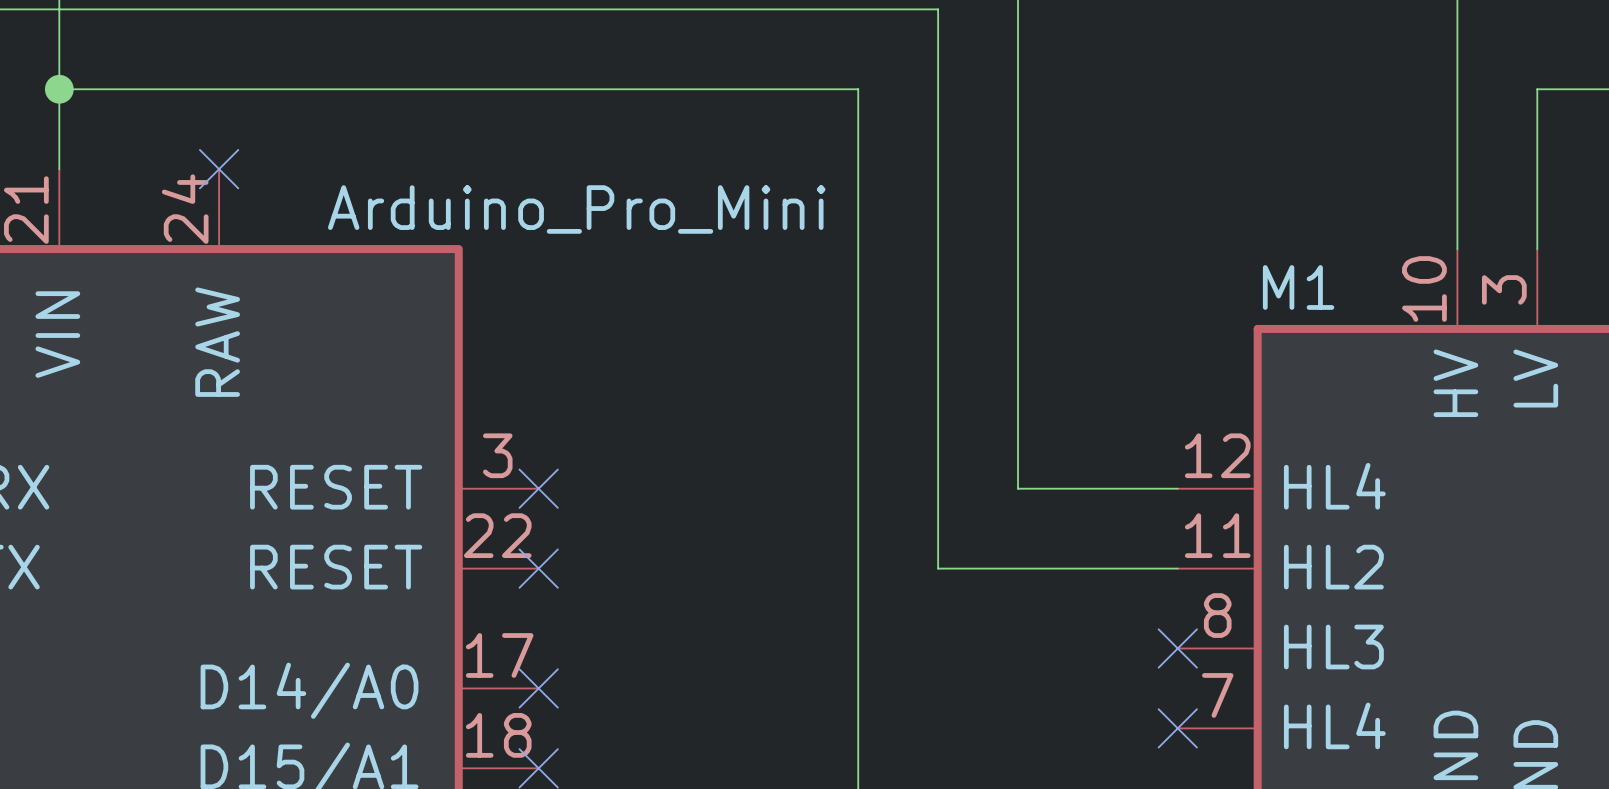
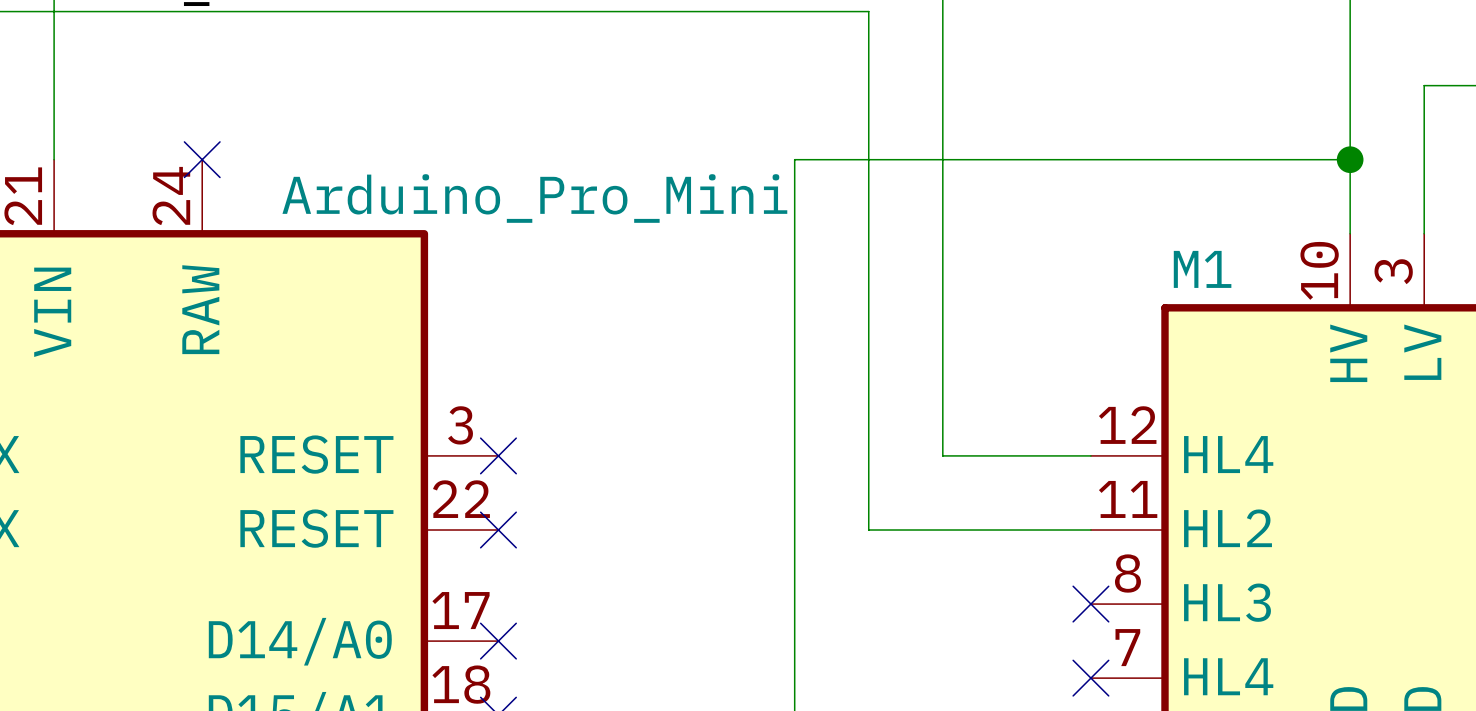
wire: (59, 89) (858, 89) (858, 169) -> (1350, 159) (794, 159)
junction: (59, 89) -> none
junction: none -> (1350, 159)

